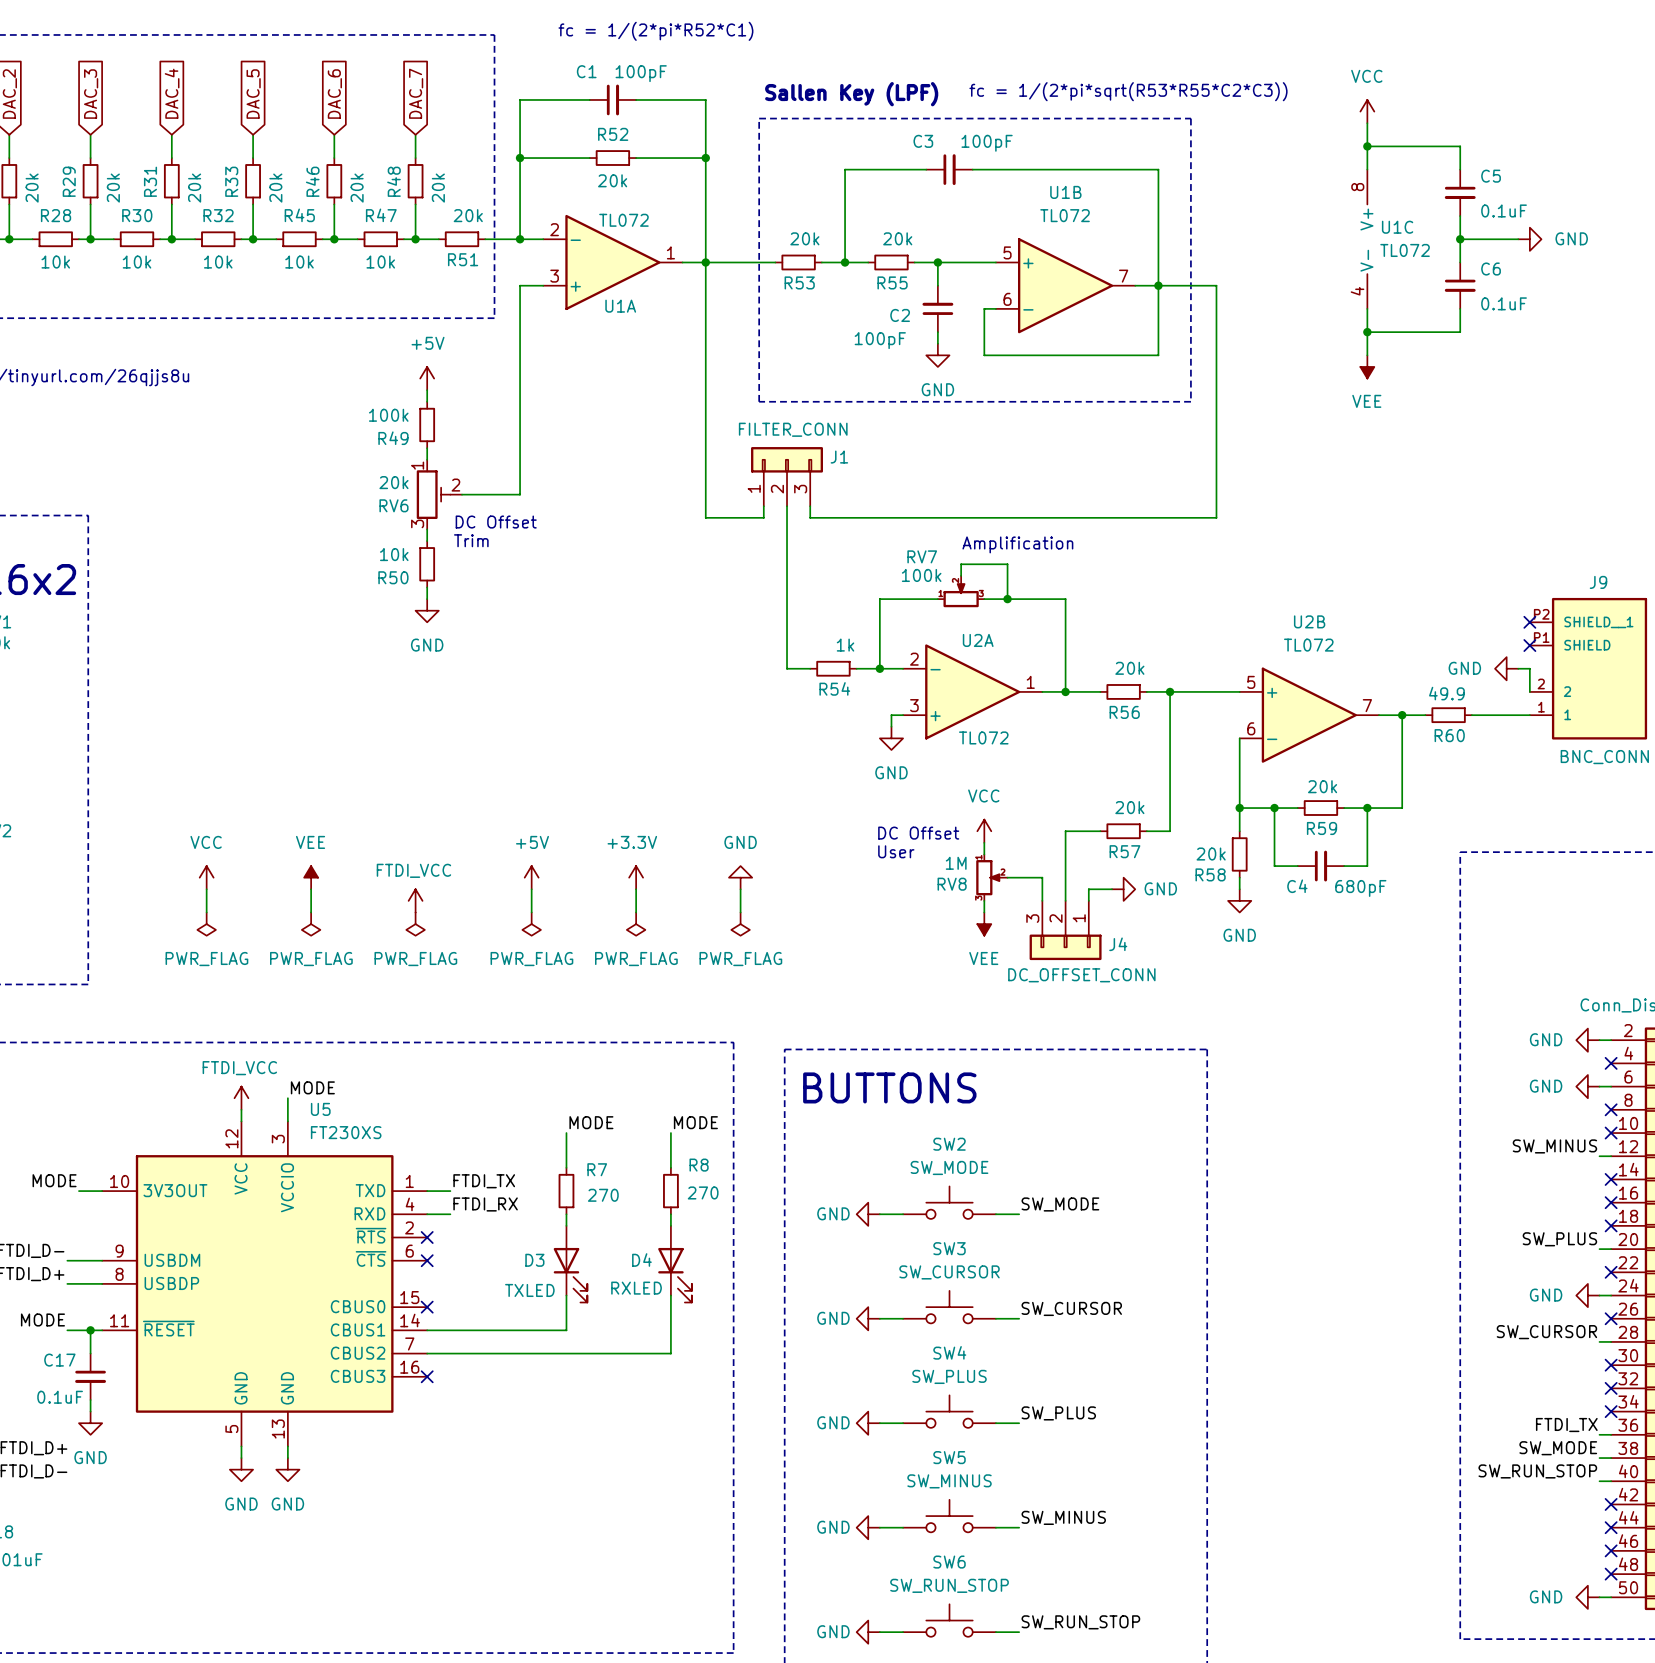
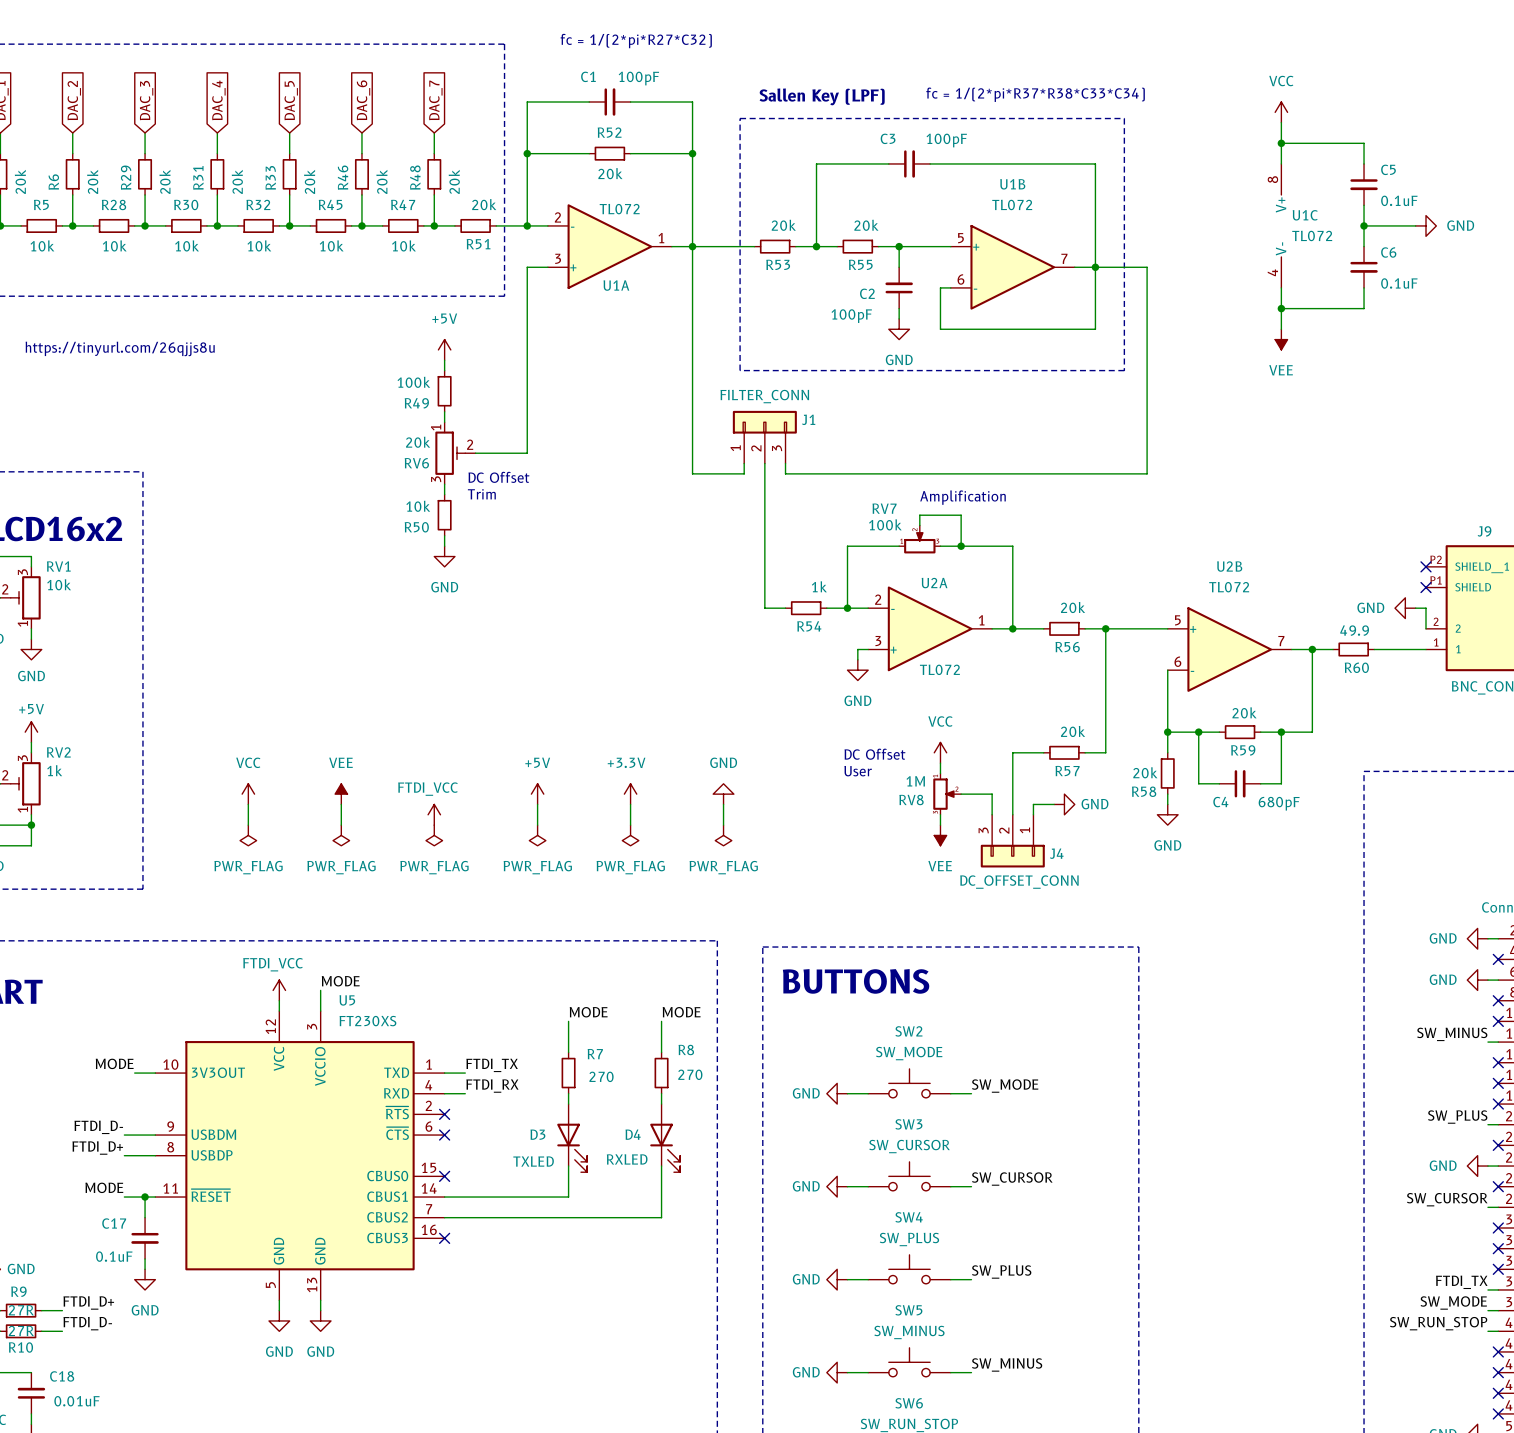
text: fc = 1/(2*pi*R52*C1) (655, 31) -> fc = 1/(2*pi*R27*C32) (636, 41)
text: fc = 1/(2*pi*sqrt(R53*R55*C2*C3)) (1128, 91) -> fc = 1/(2*pi*R37*R38*C33*C34) (1035, 94)

